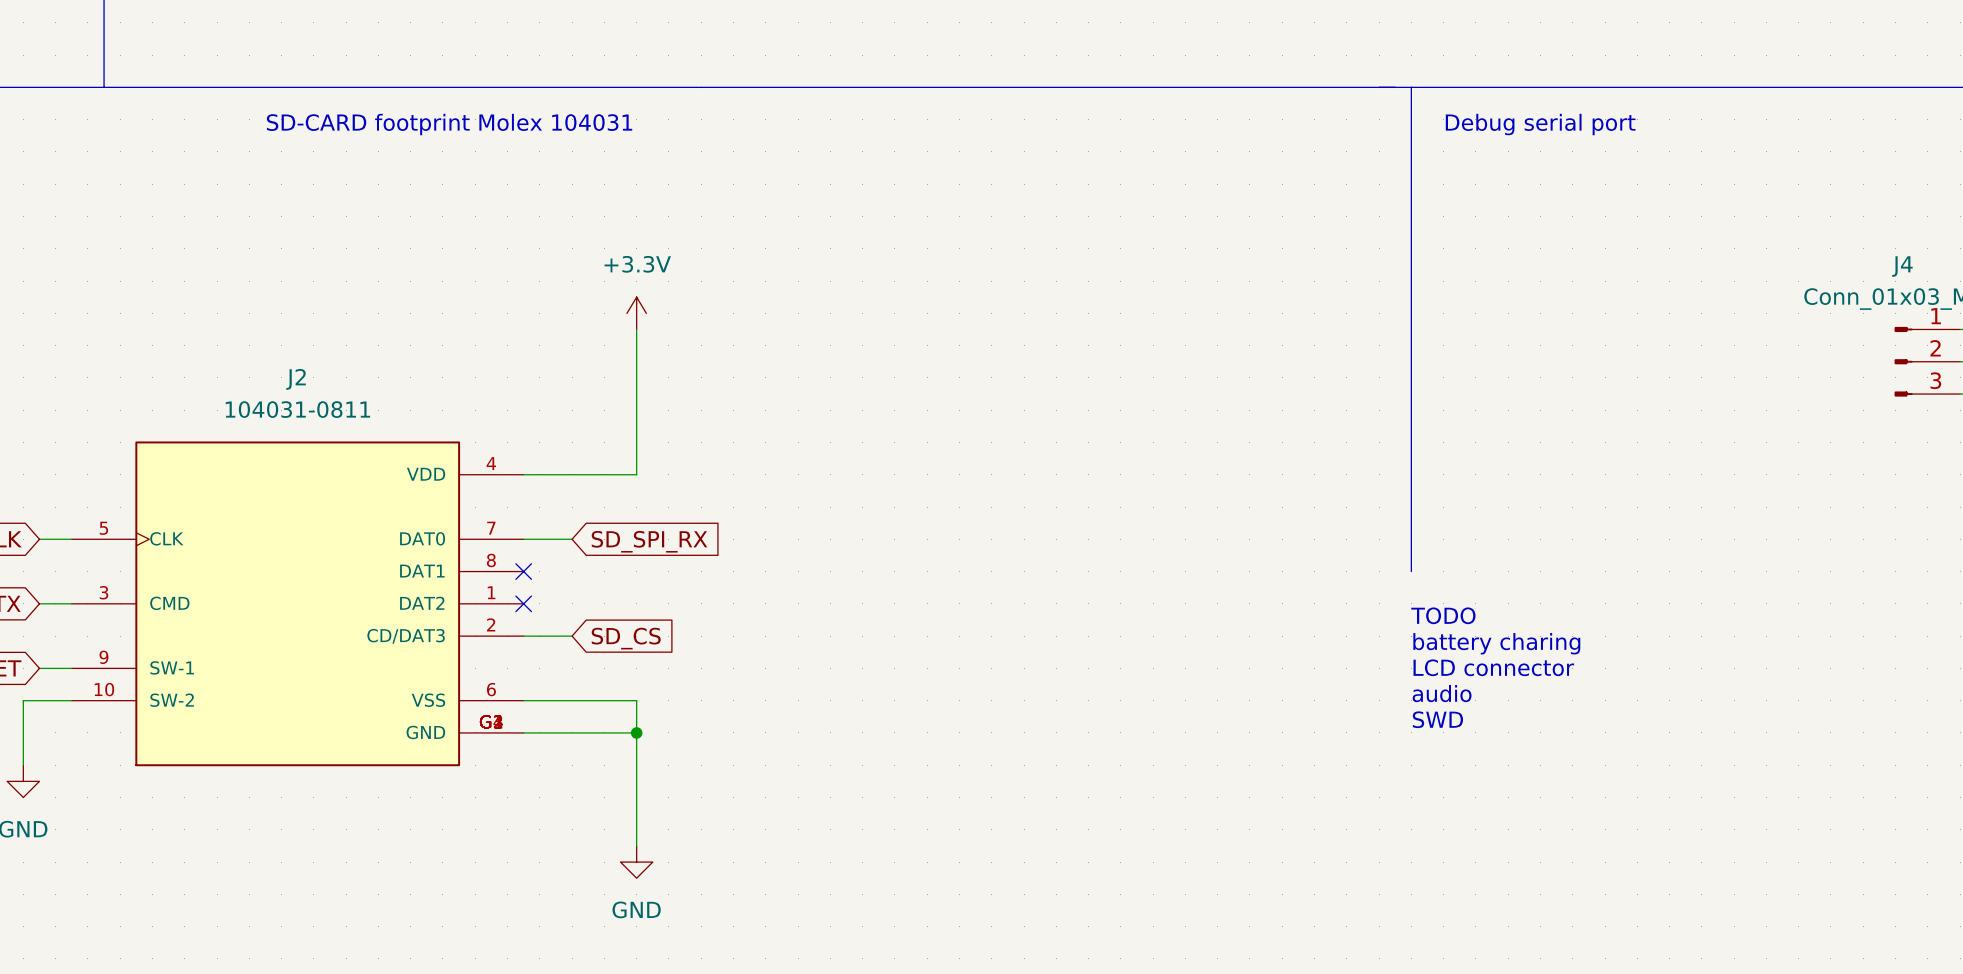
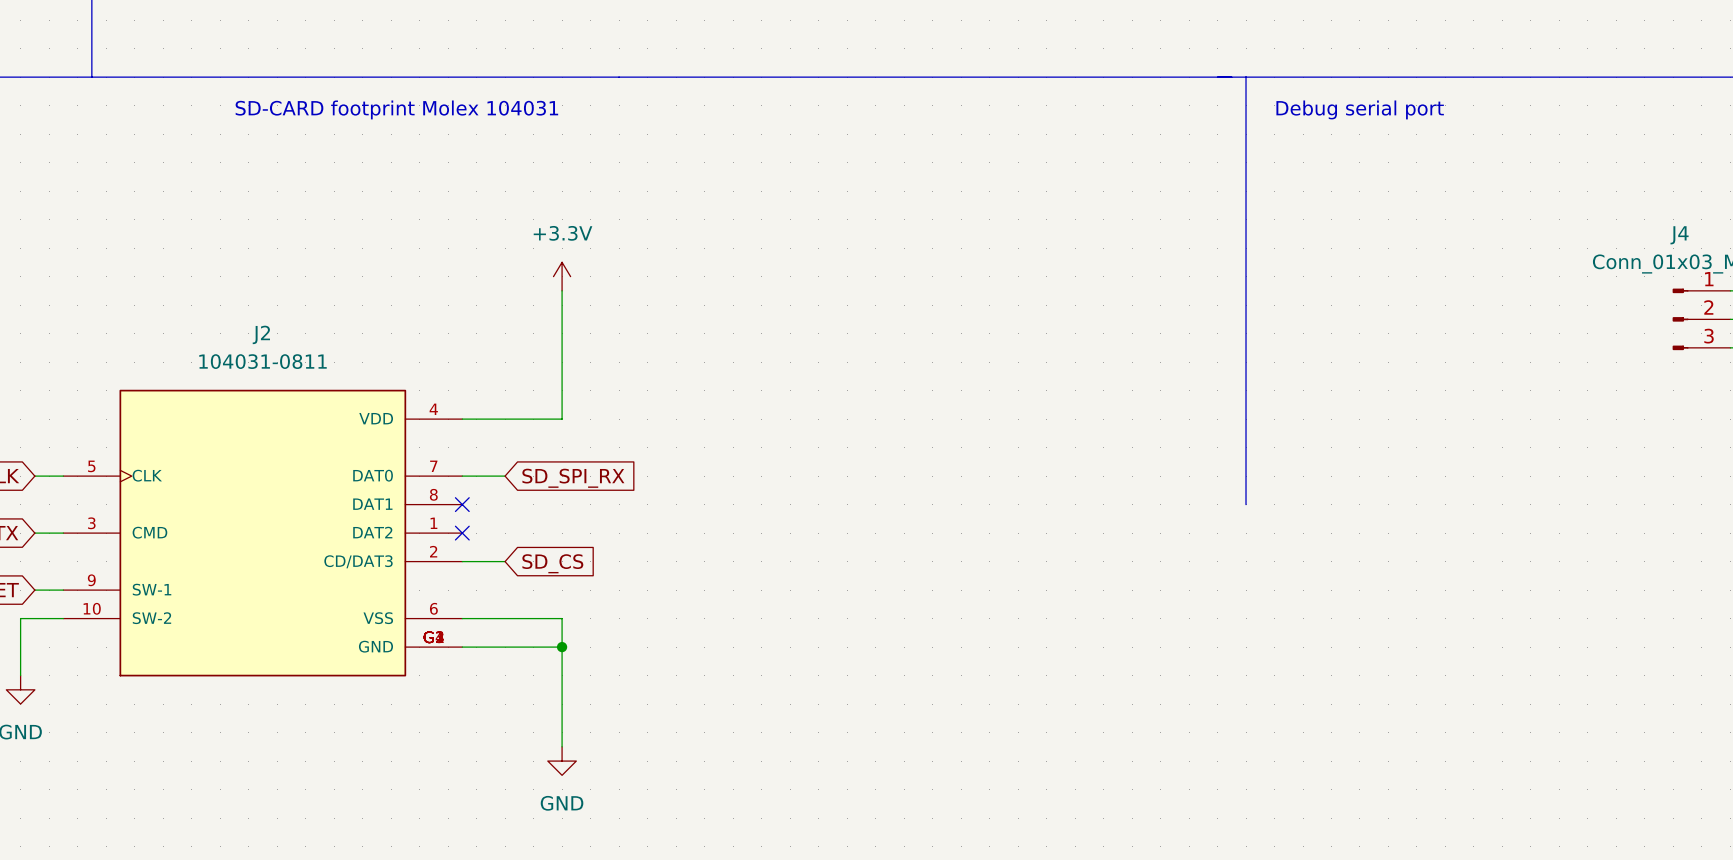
text: TODO (1443, 615) -> none
text: battery charing (1496, 643) -> none
text: LCD connector (1493, 667) -> none
text: audio (1442, 693) -> none
text: SWD (1437, 719) -> none

